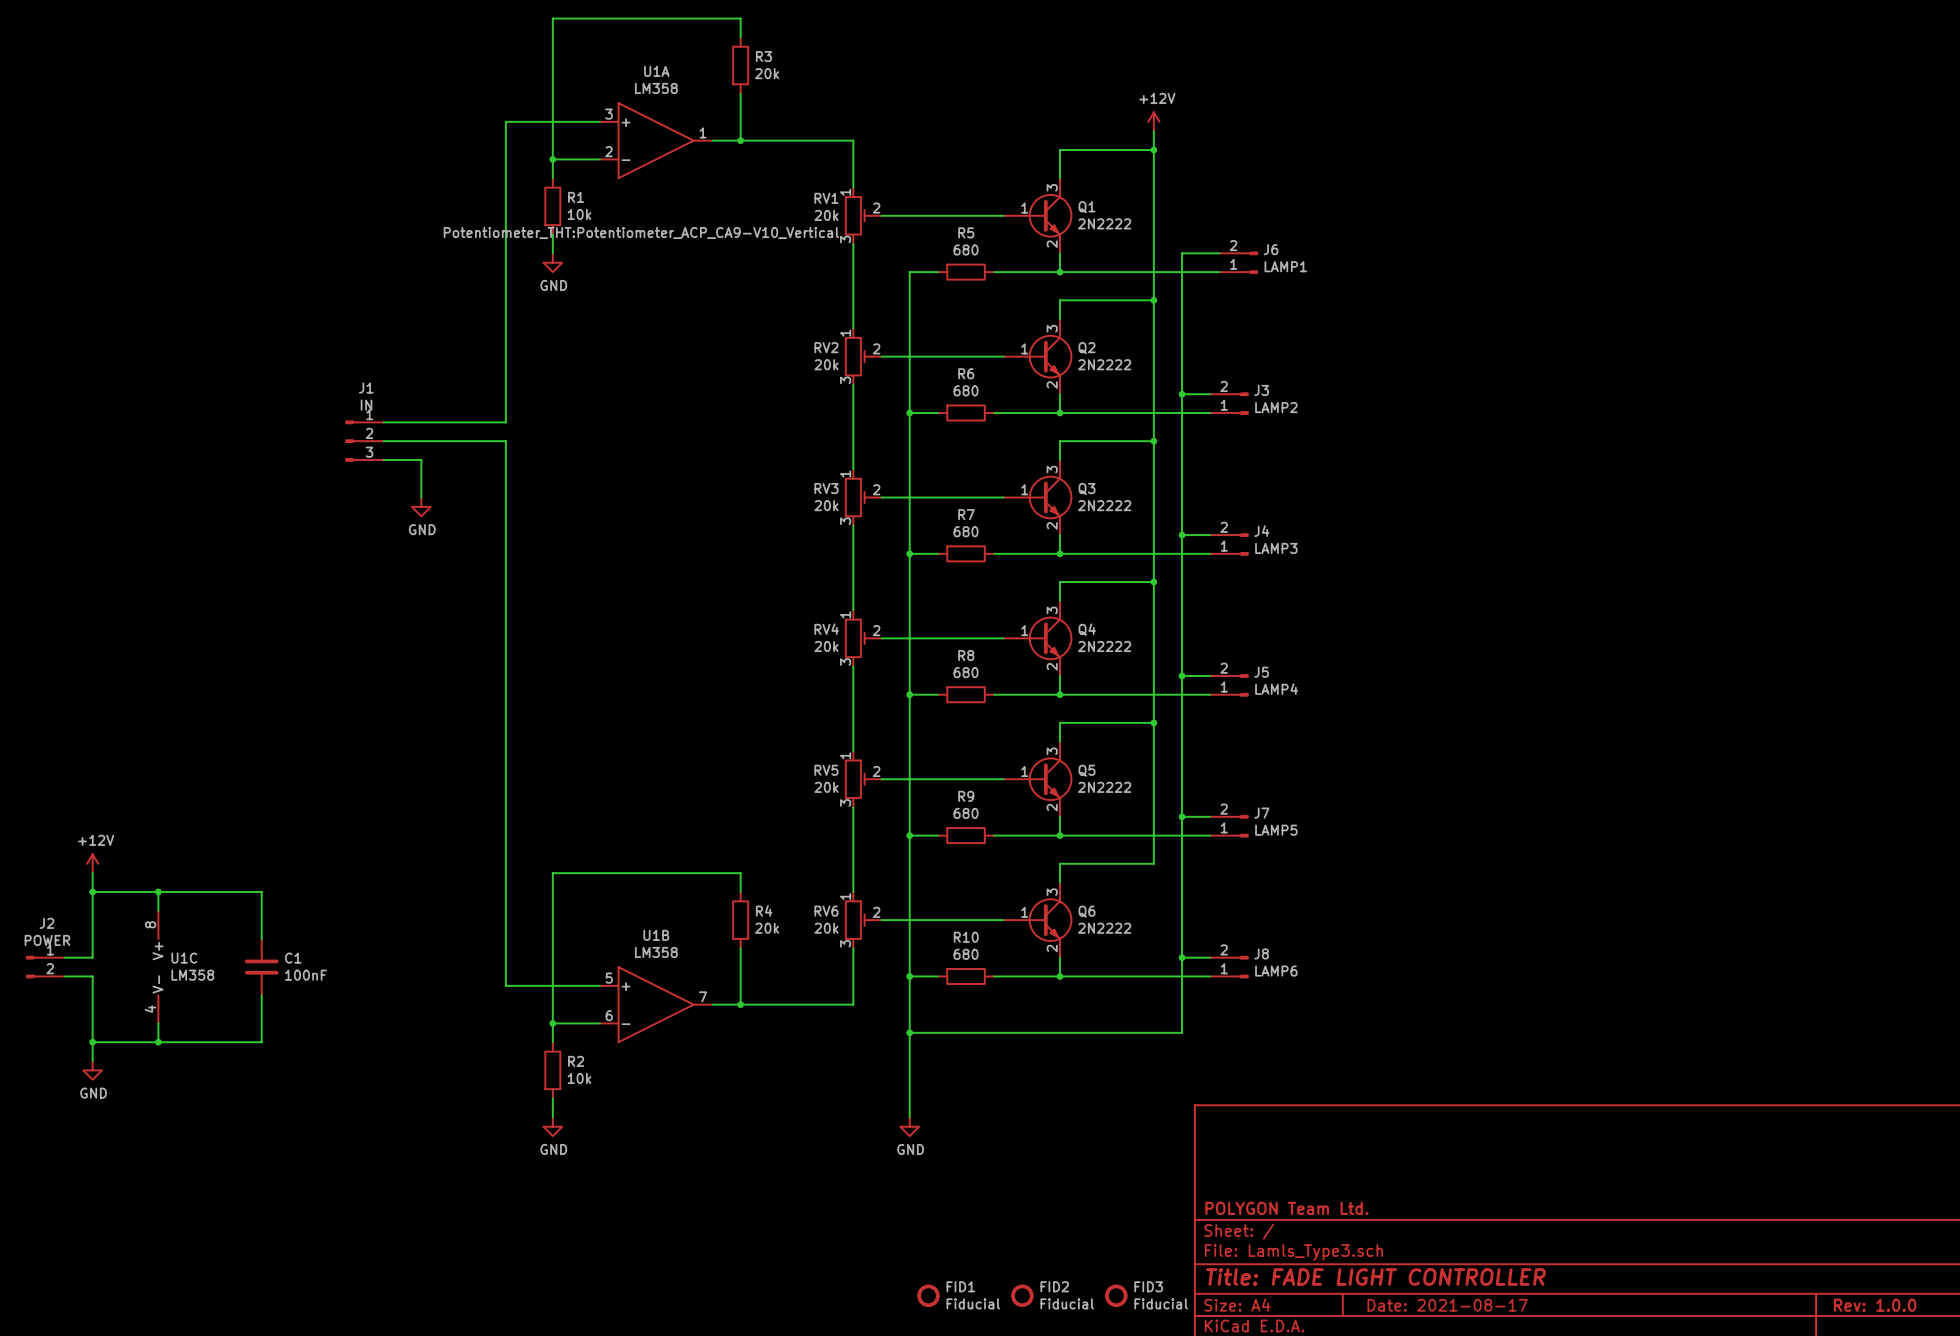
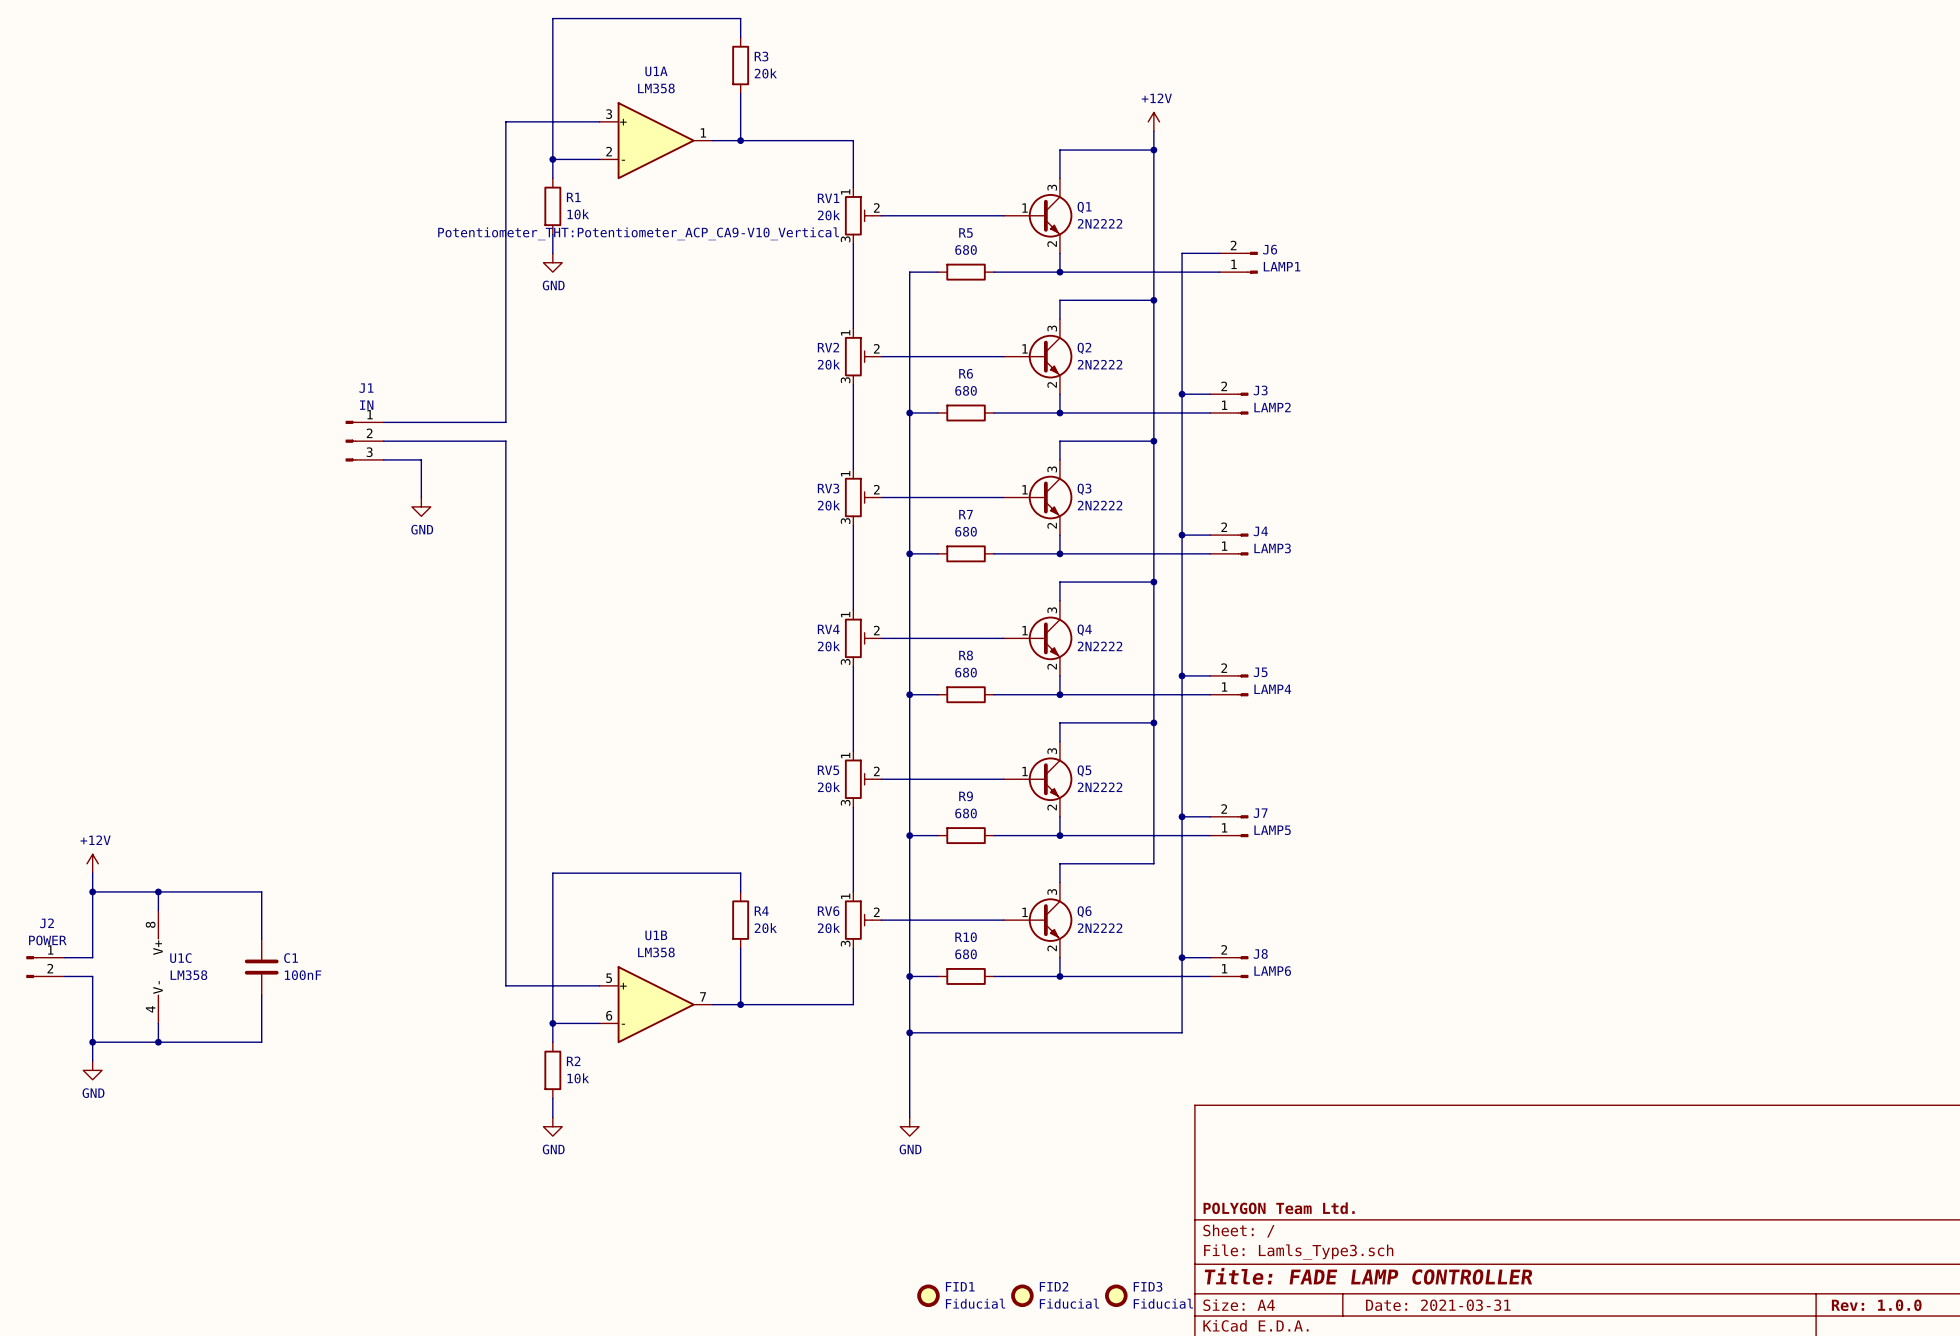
title block: Title: FADE LIGHT CONTROLLER (1376, 1277) -> Title: FADE LAMP CONTROLLER (1368, 1276)
title block: Date: 2021-08-17 (1447, 1305) -> Date: 2021-03-31 (1438, 1305)

